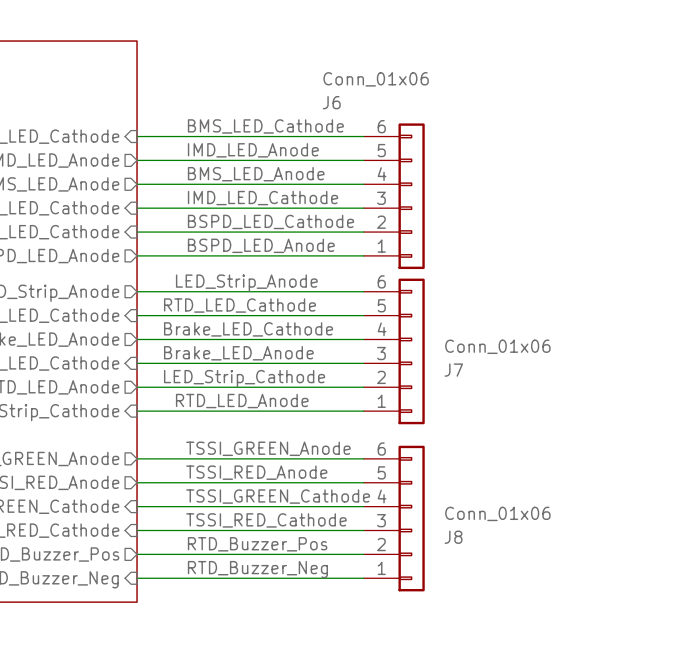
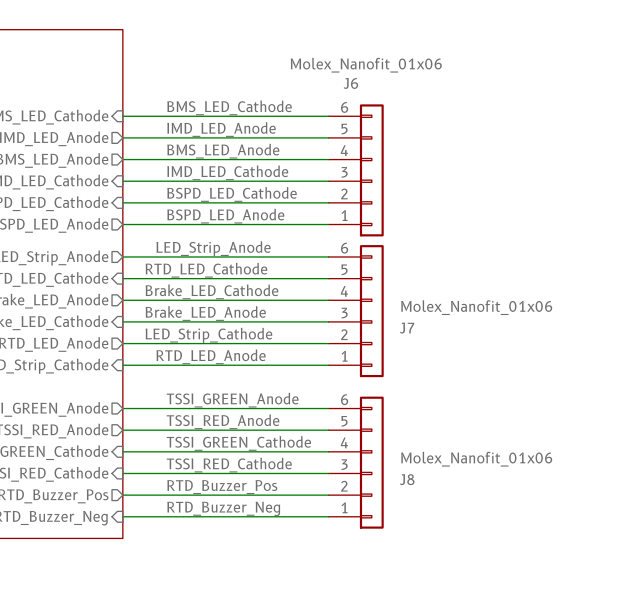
J6 value: Conn_01x06 (376, 79) -> Molex_Nanofit_01x06 (366, 65)
J6 name position: J6 (331, 102) -> J6 (350, 83)
J7 value: Conn_01x06 (497, 346) -> Molex_Nanofit_01x06 (476, 307)
J8 value: Conn_01x06 (497, 513) -> Molex_Nanofit_01x06 (476, 459)

